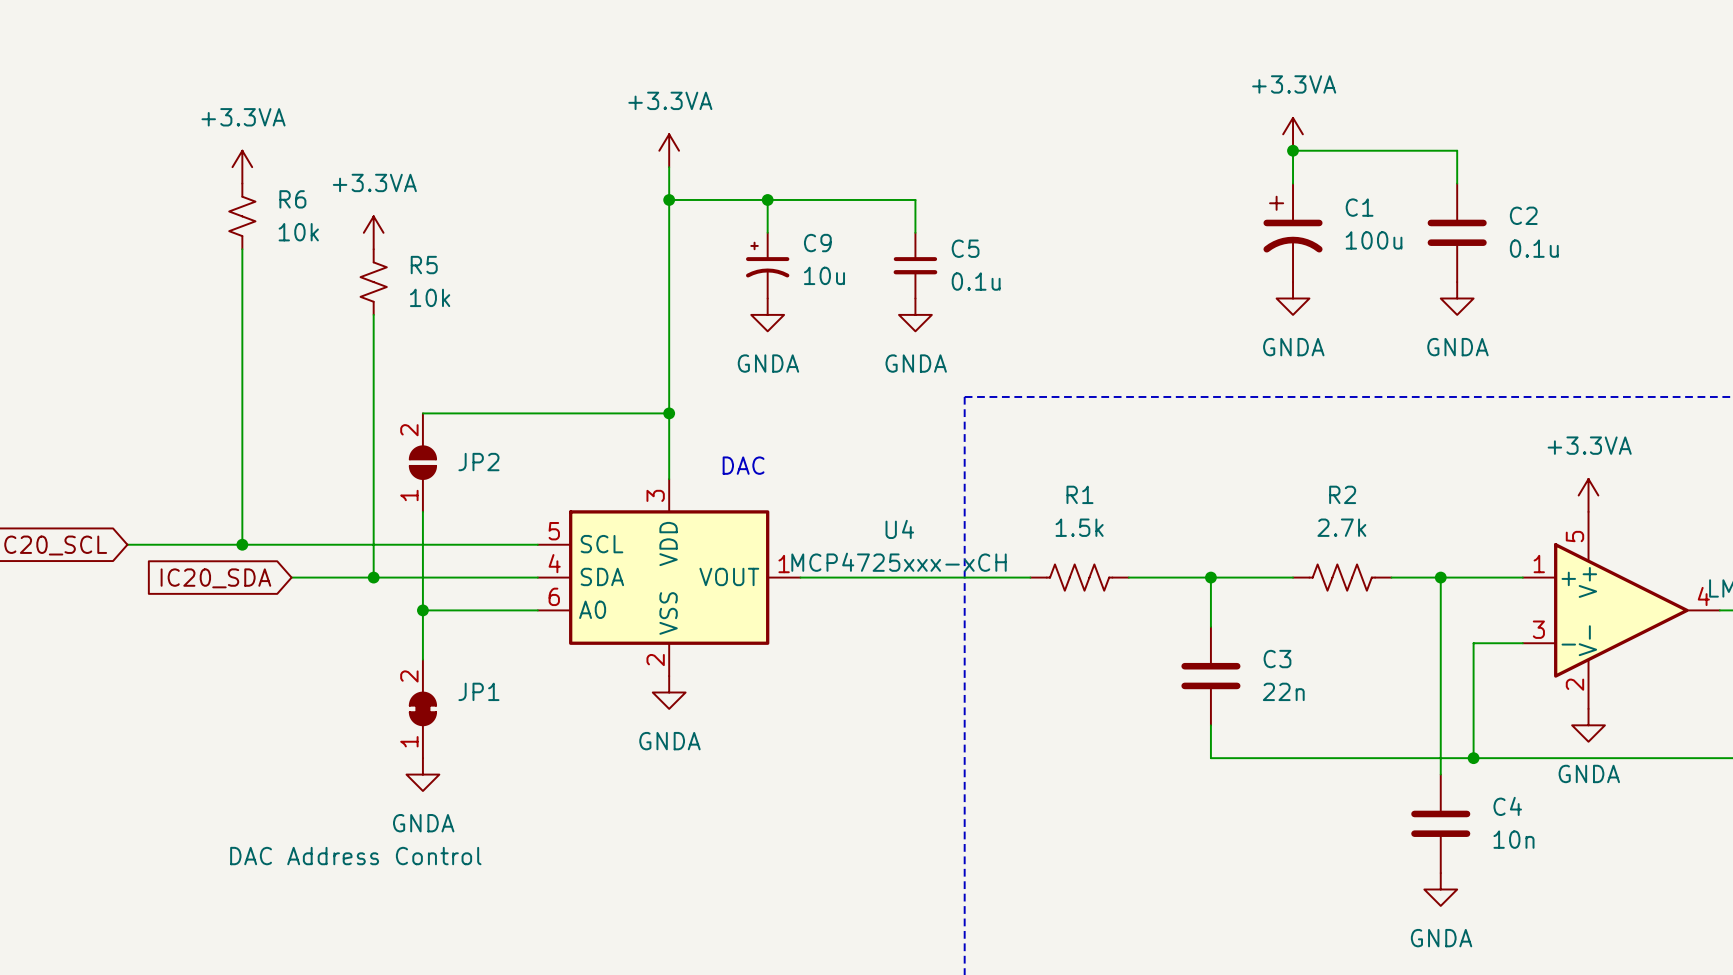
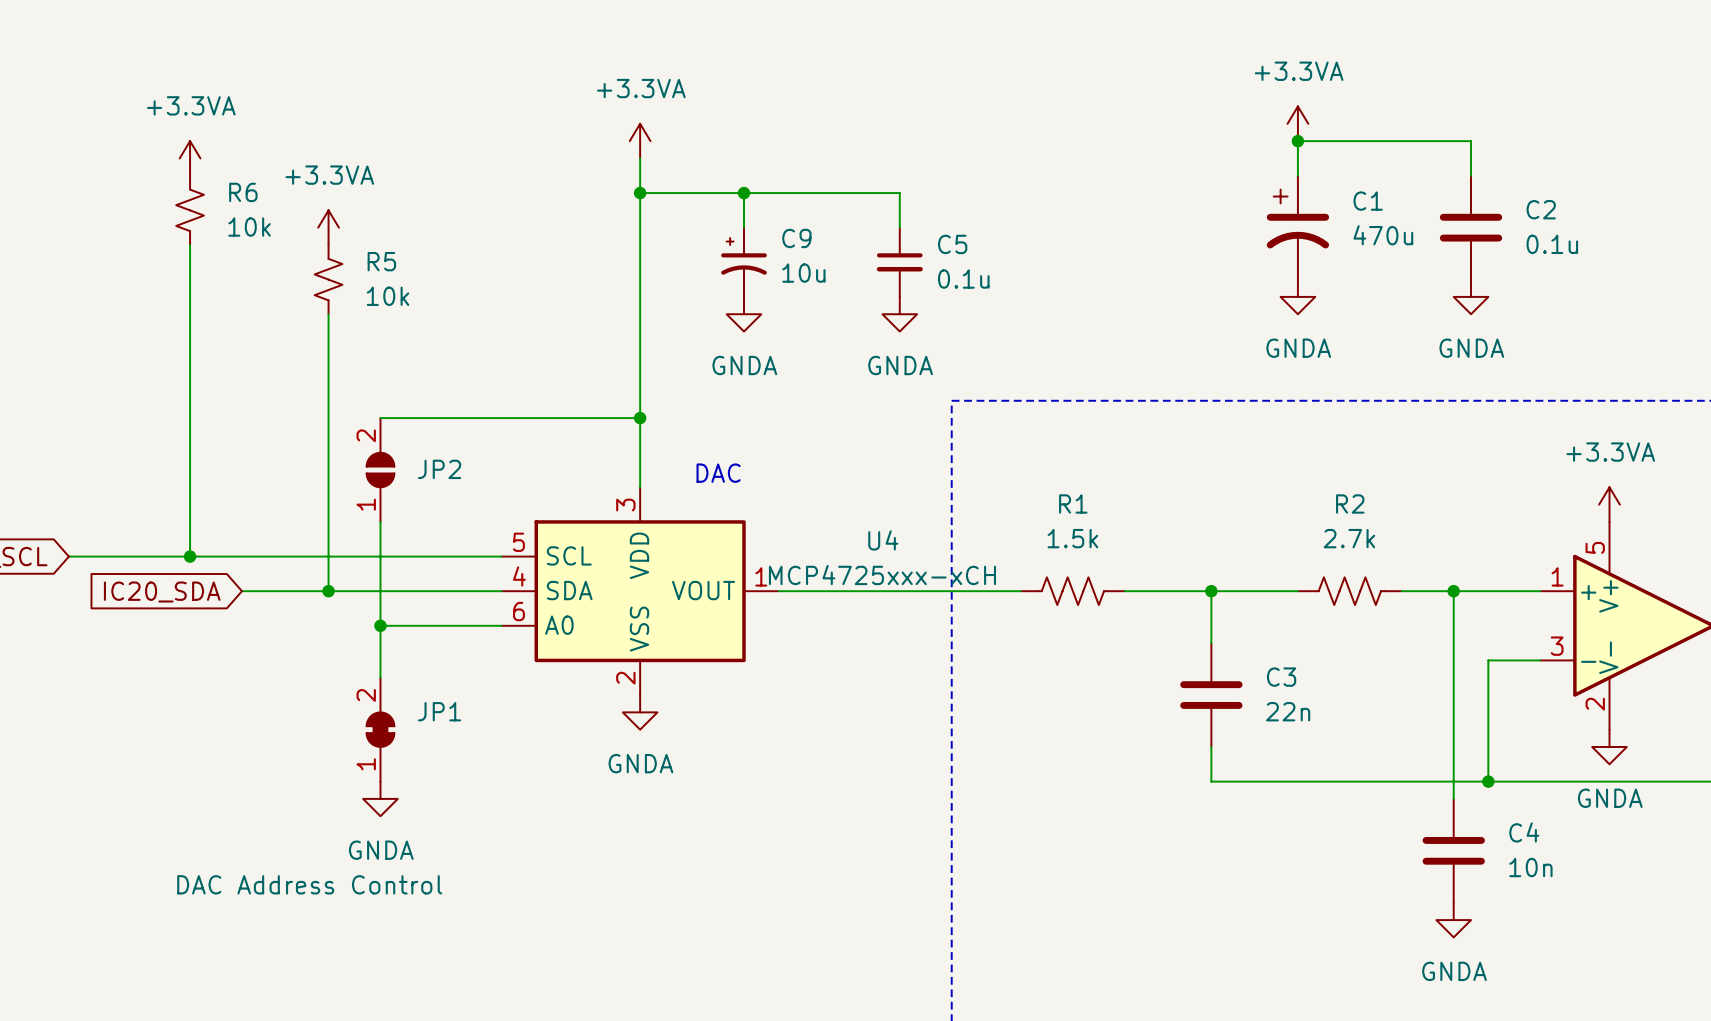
C1 value: 100u (1374, 240) -> 470u (1383, 235)

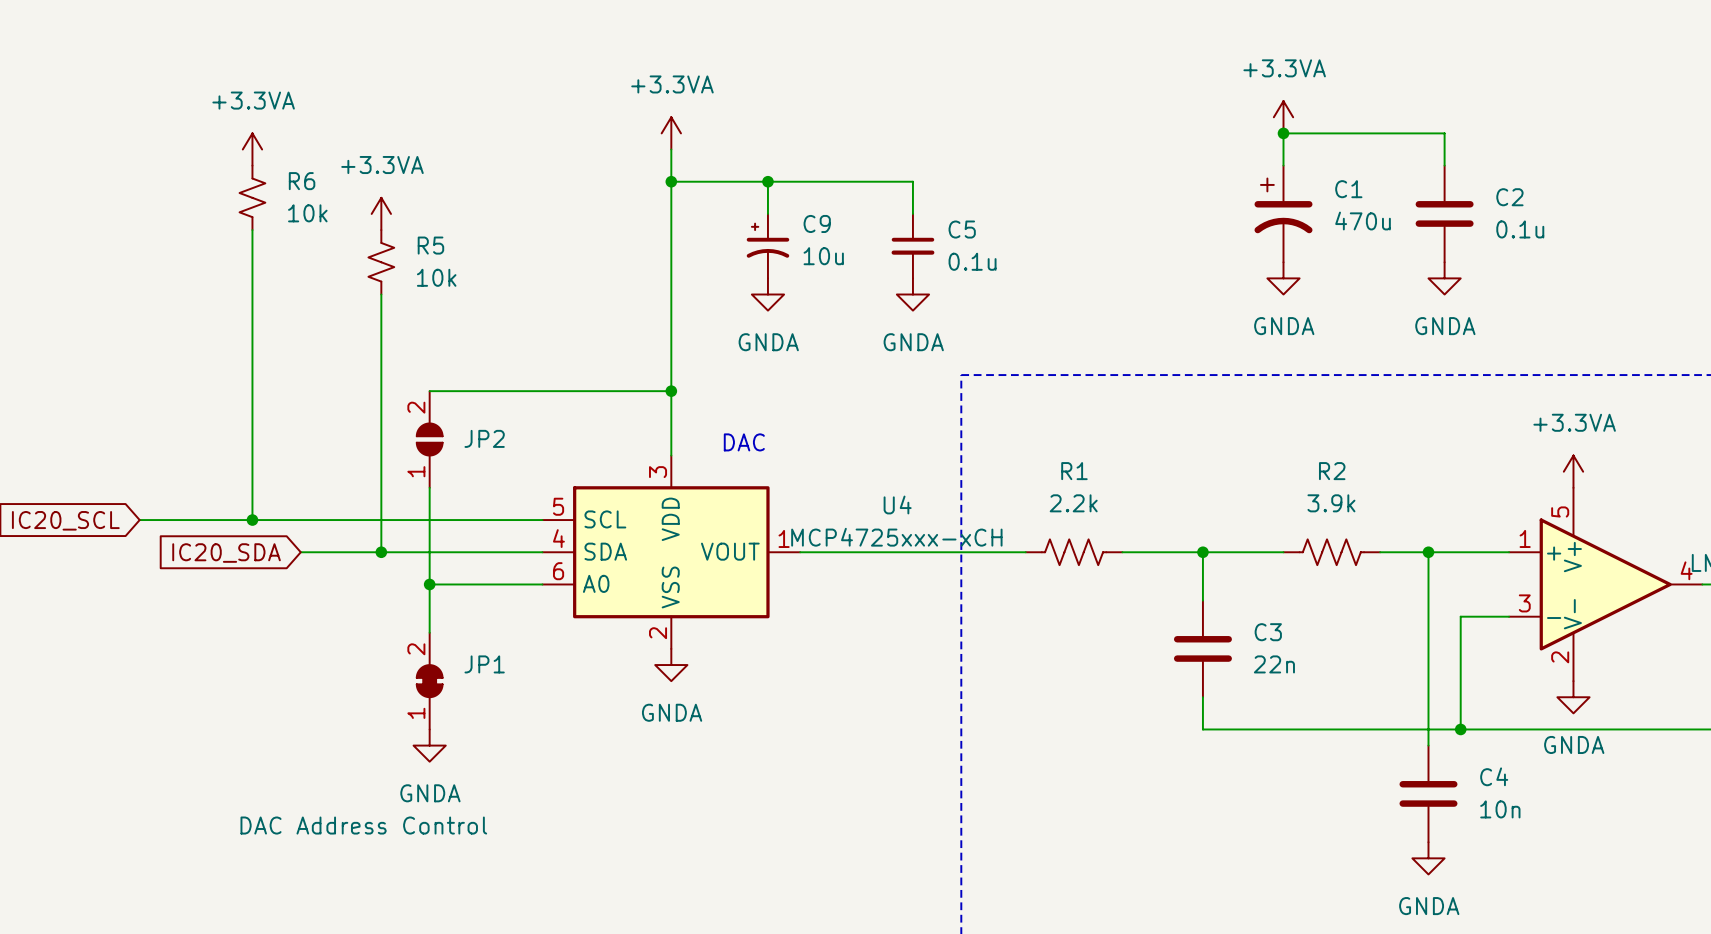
R1 value: 1.5k (1072, 538) -> 2.2k (1073, 503)
R2 value: 2.7k (1349, 538) -> 3.9k (1331, 503)

